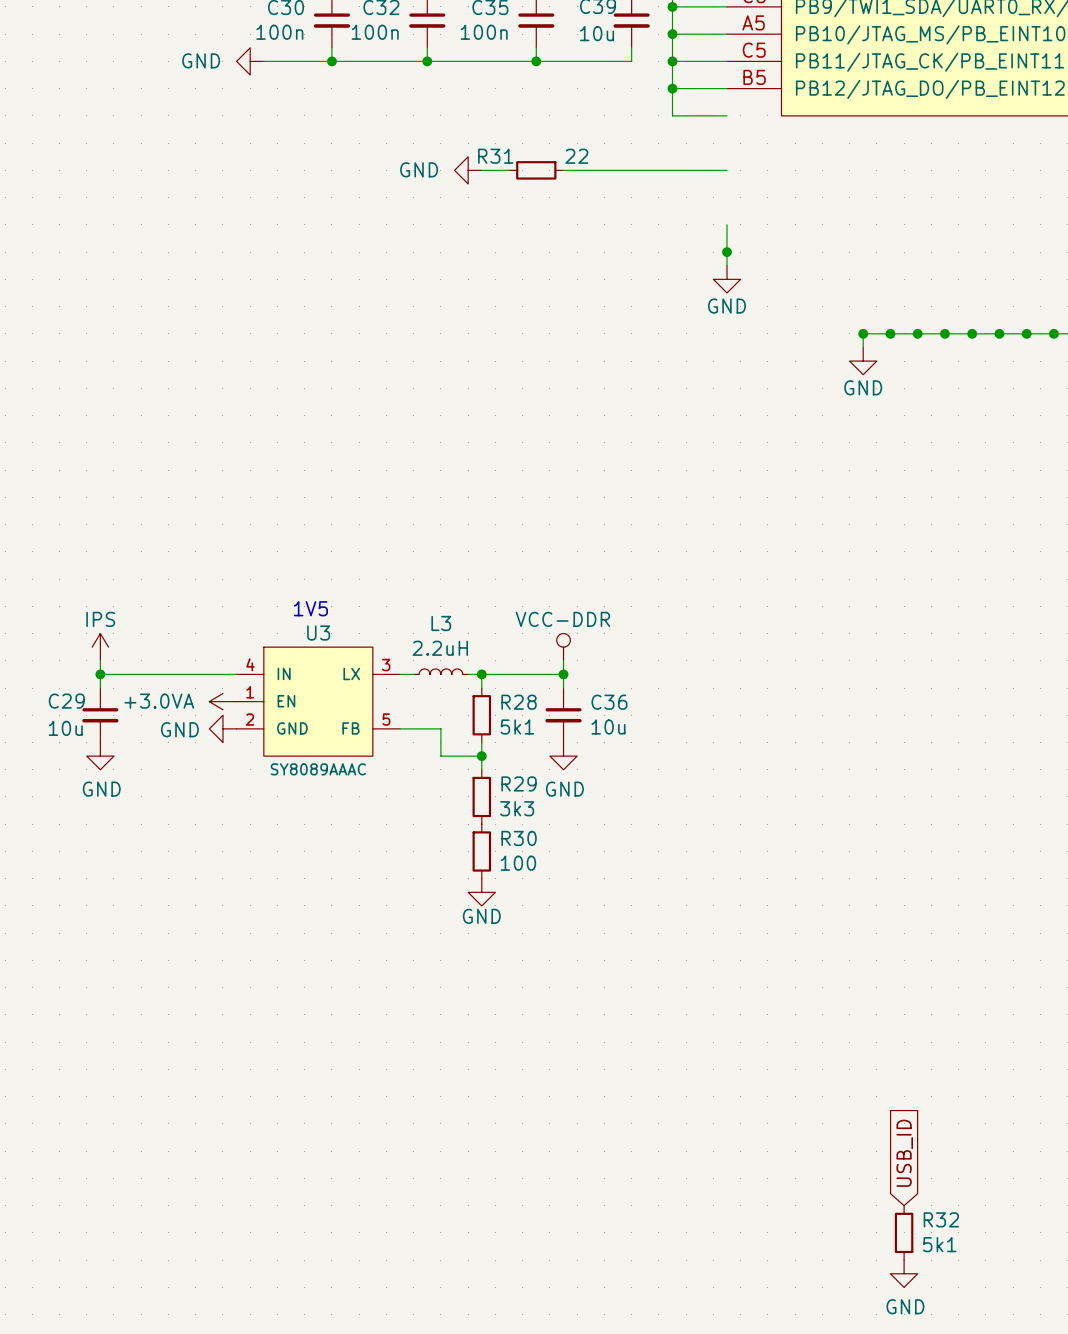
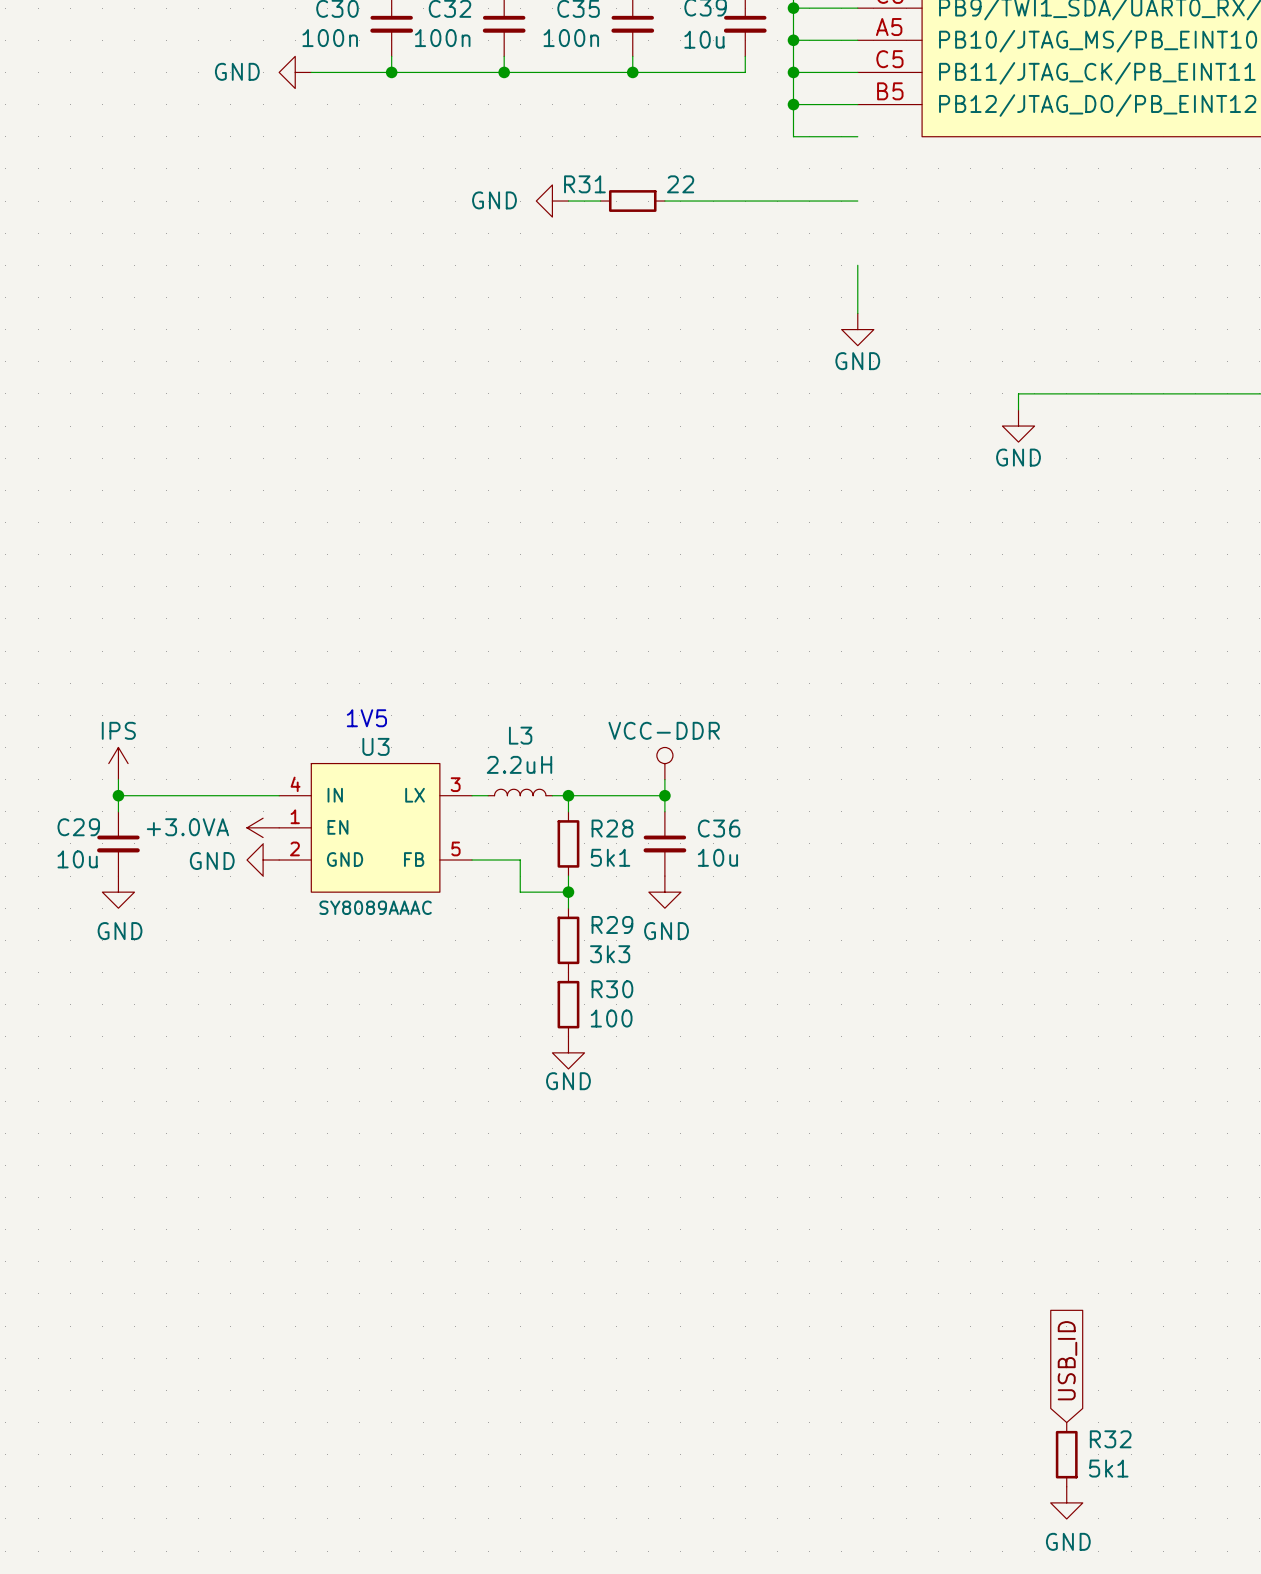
junction: (727, 252) -> none
junction: (863, 333) -> none
junction: (890, 333) -> none
junction: (917, 333) -> none
junction: (944, 333) -> none
junction: (972, 333) -> none
junction: (999, 333) -> none
junction: (1026, 333) -> none
junction: (1053, 333) -> none

